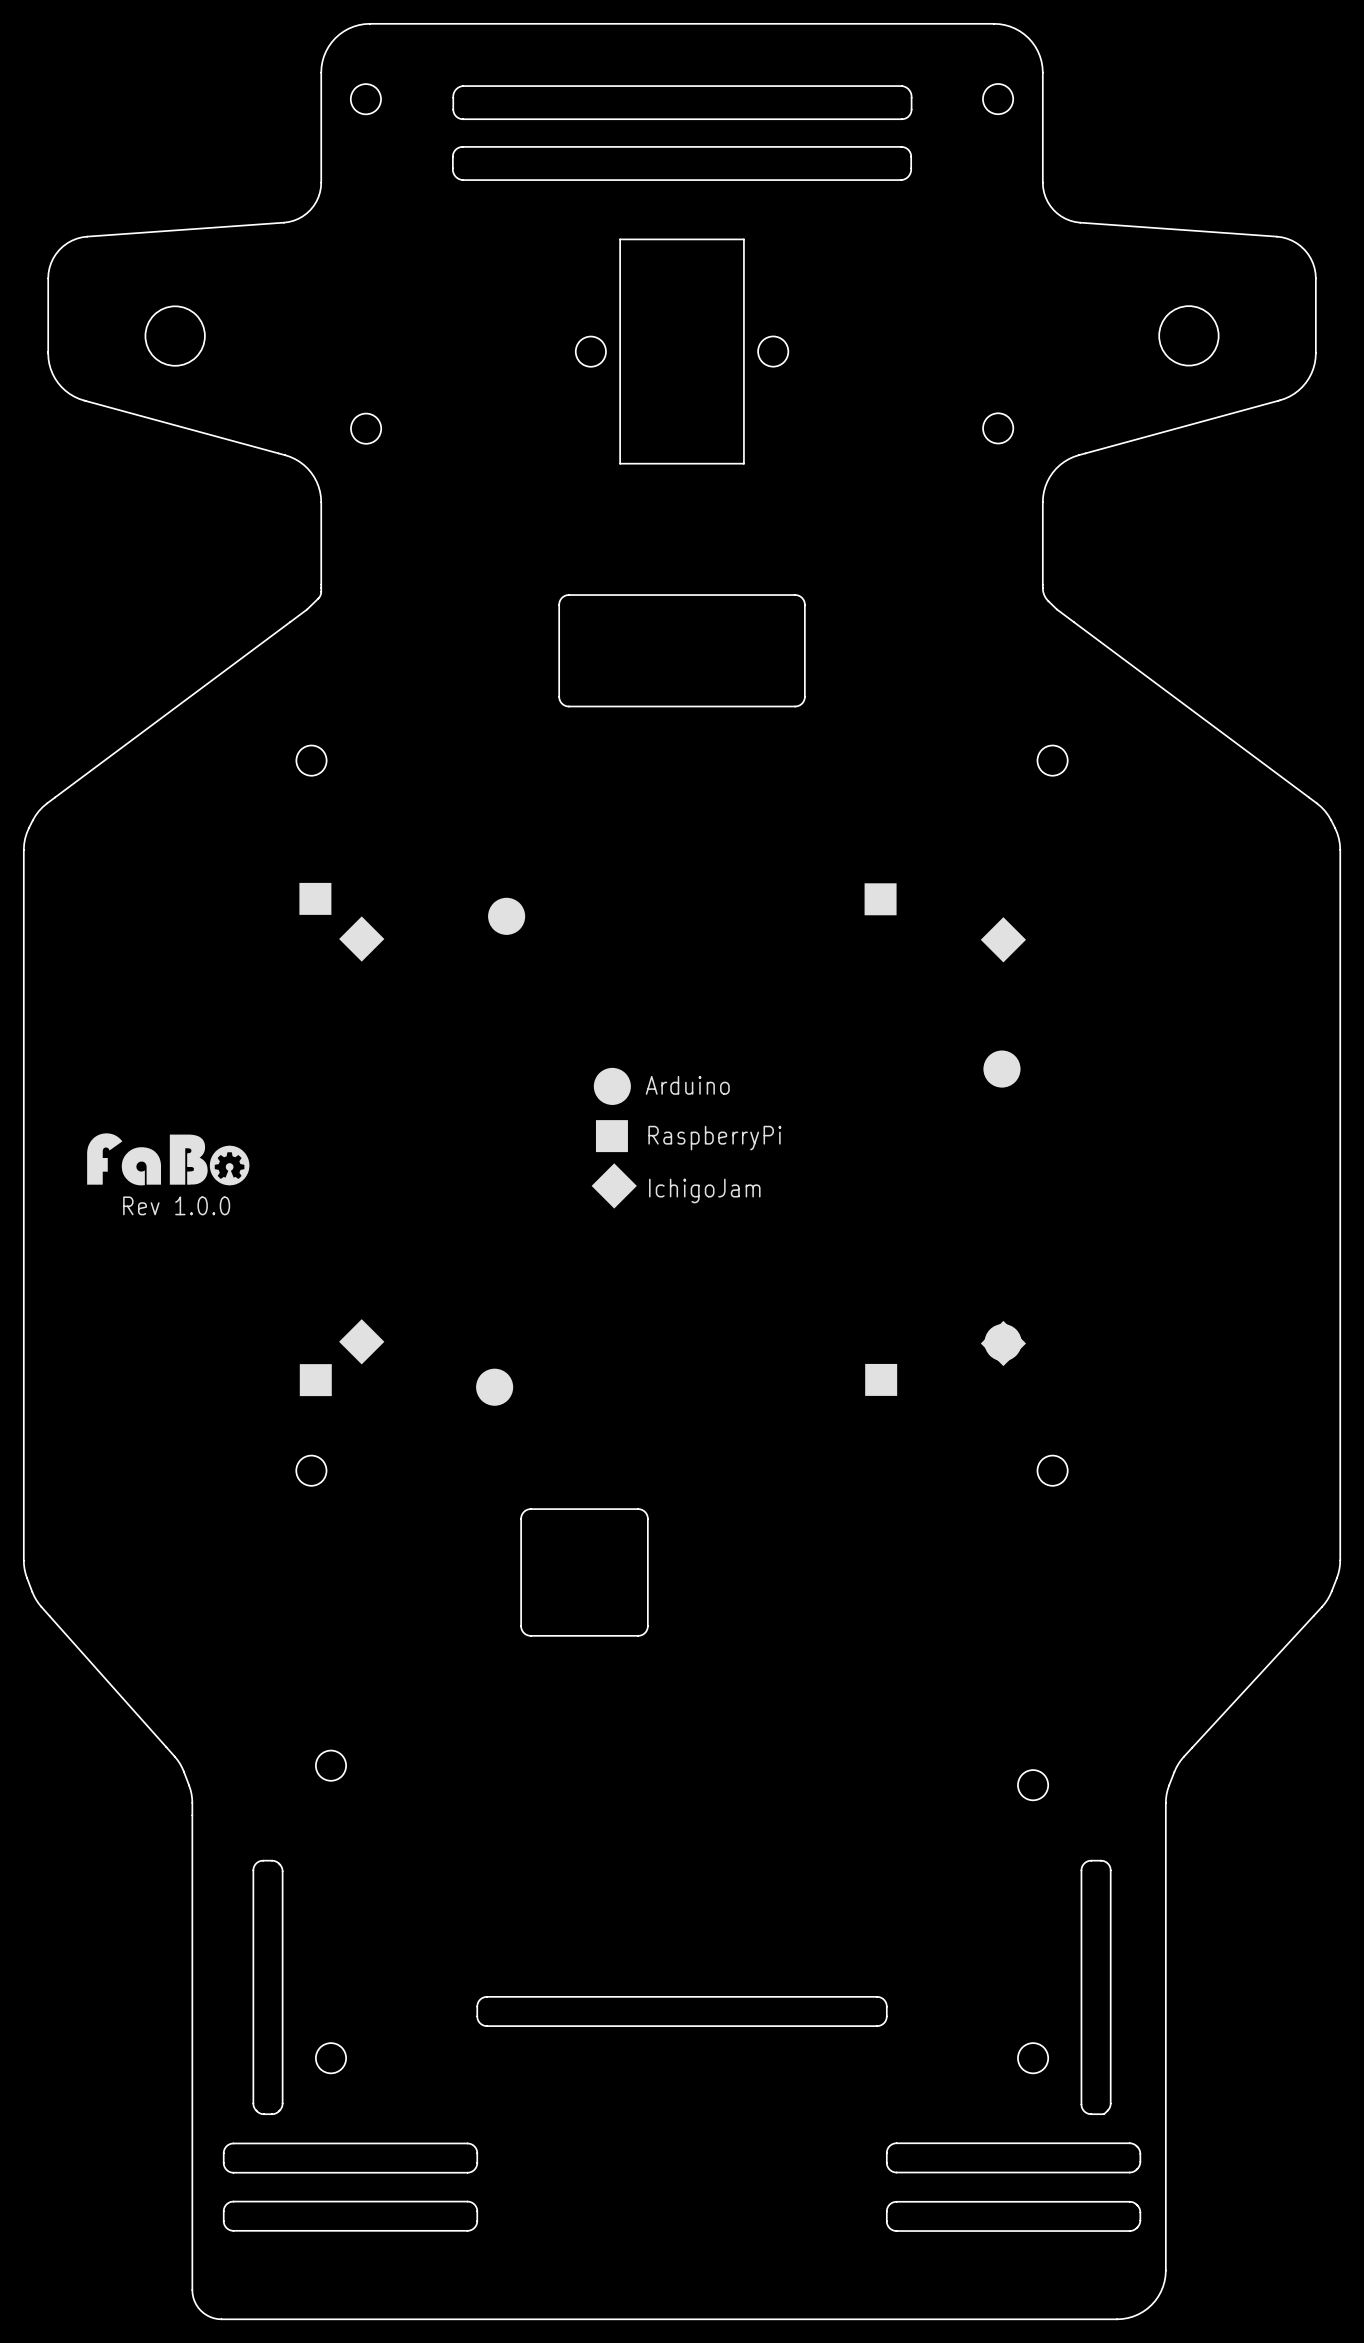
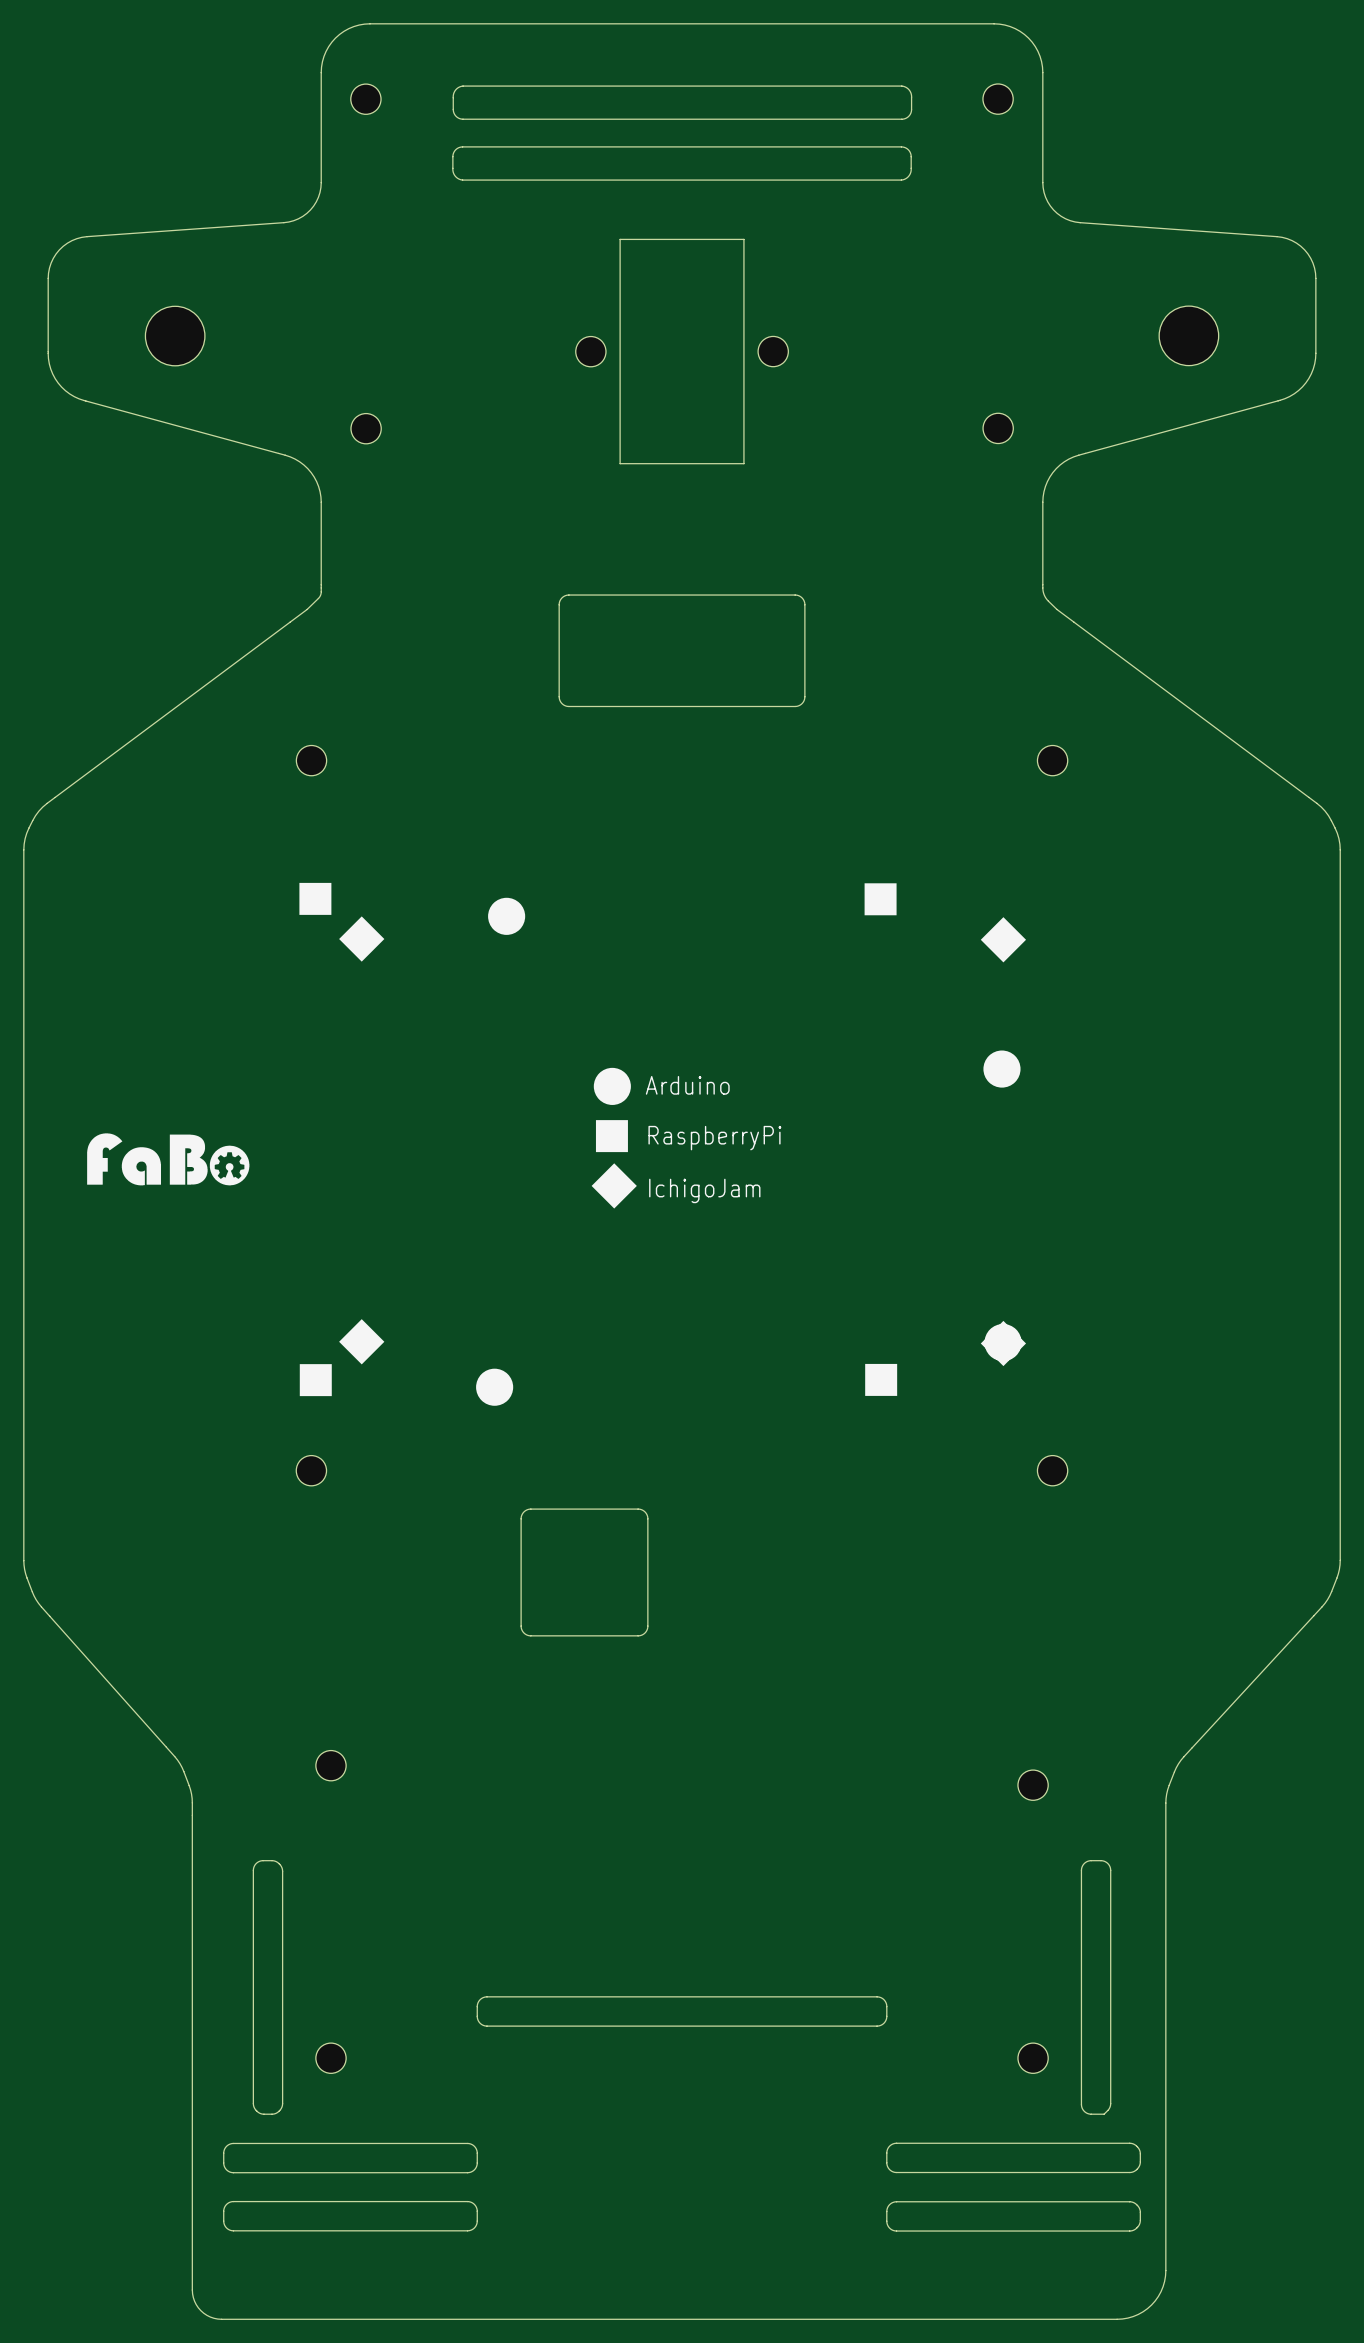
text: Rev 1.0.0 (176, 1205) -> none

